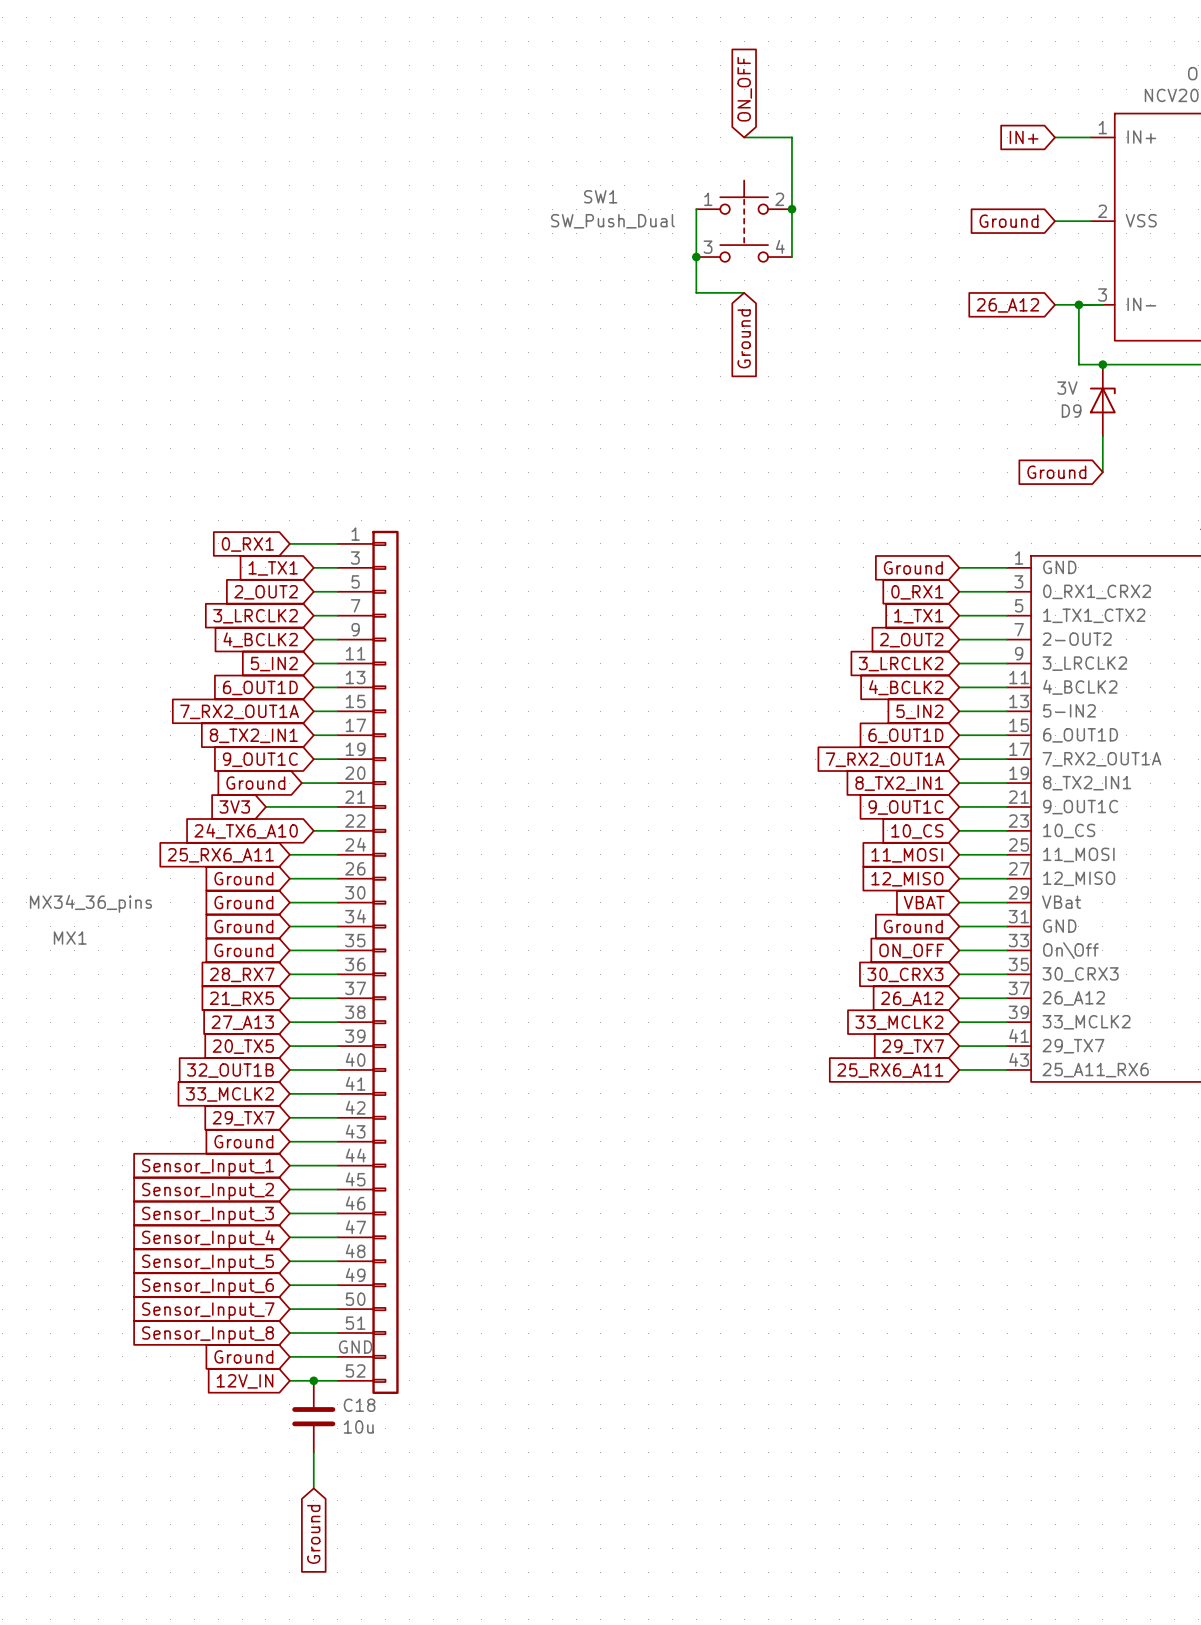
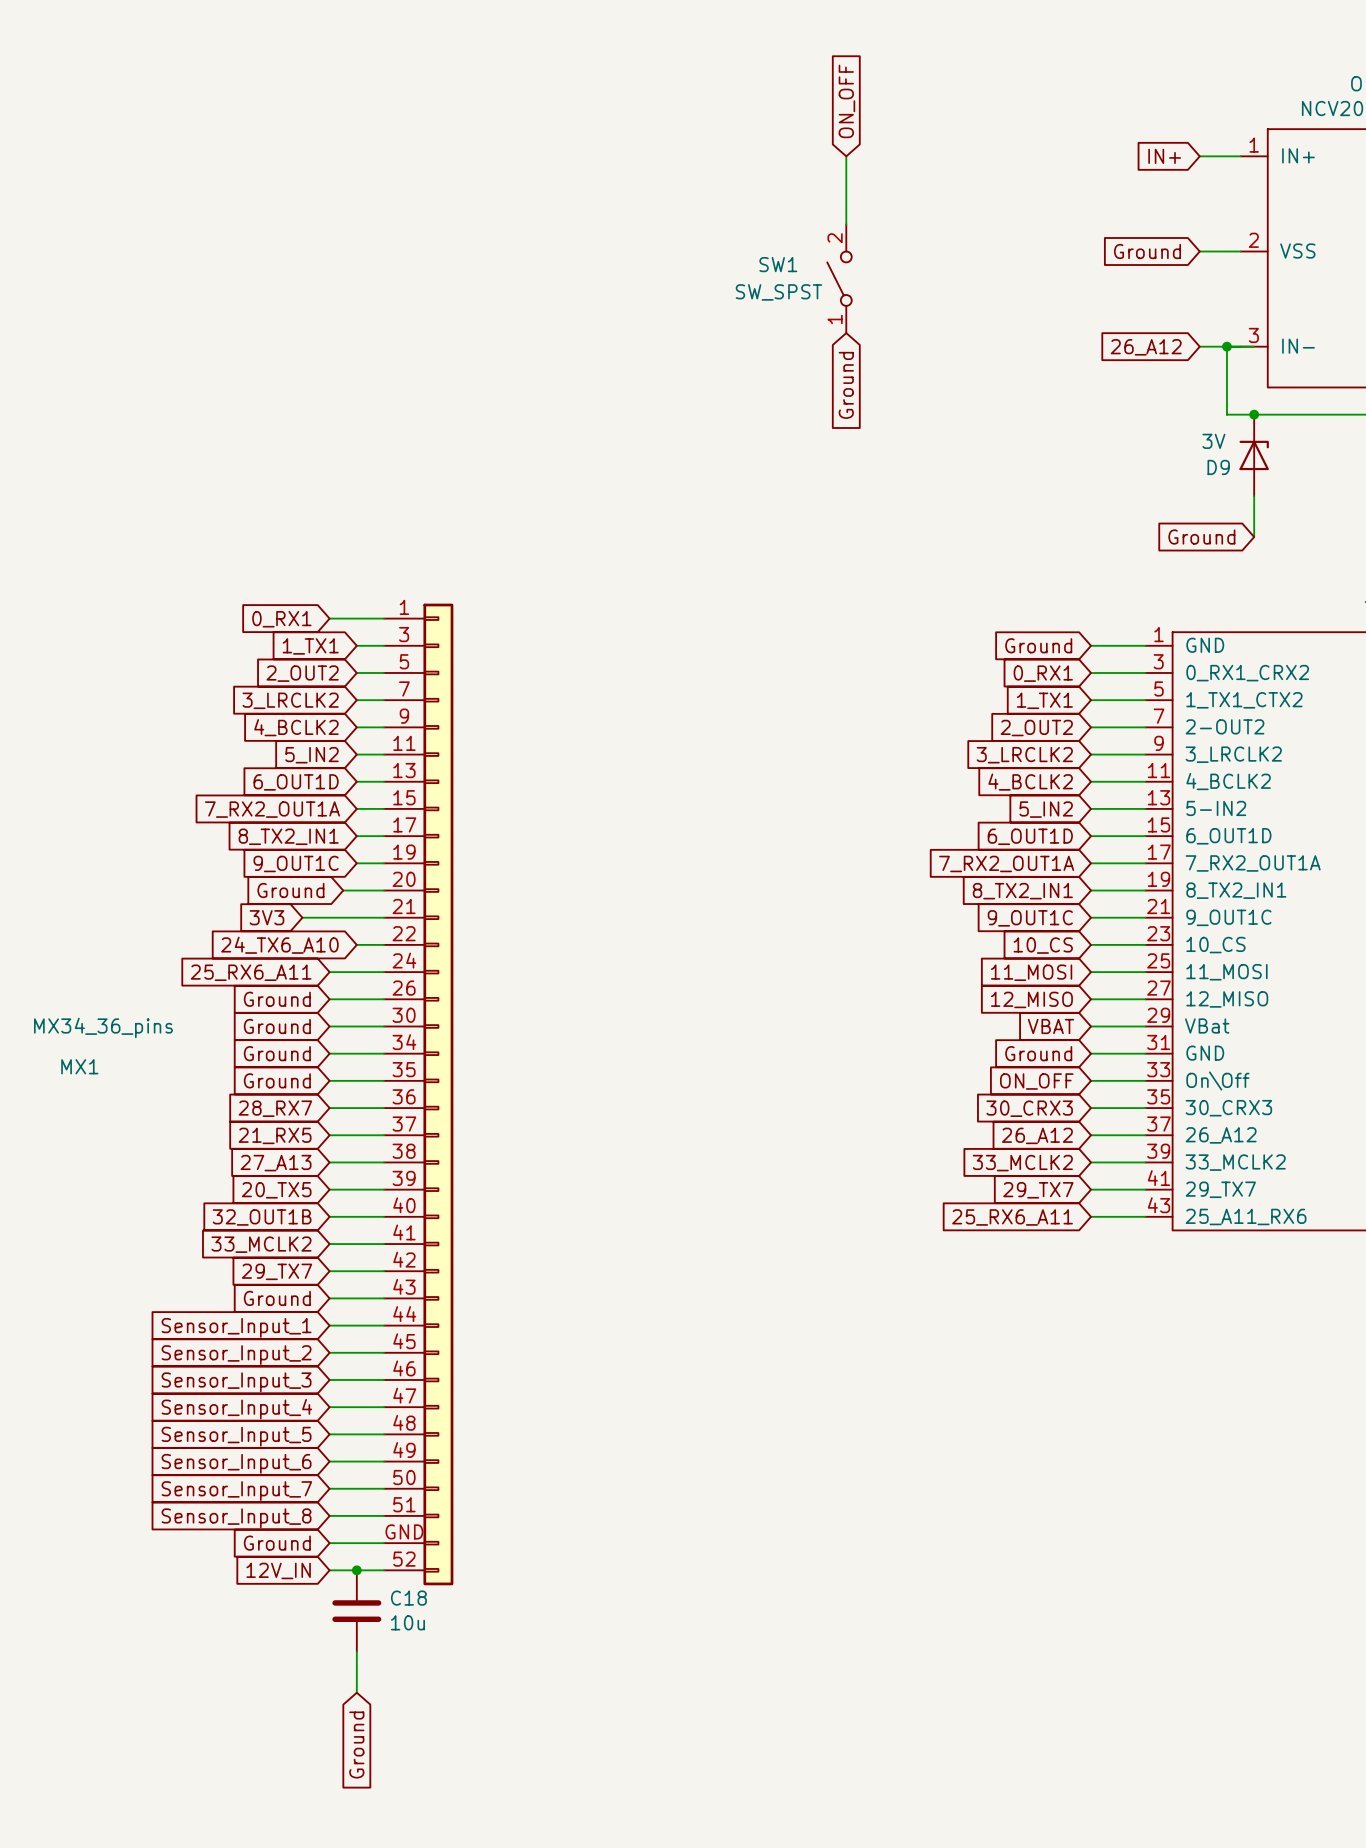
wire: (744, 137) (791, 137) (791, 257) -> (846, 156) (846, 224)
SW1 symbol: [696, 180, 792, 262] -> [827, 224, 852, 334]
SW1 name position: SW1 (600, 196) -> SW1 (778, 264)
wire: (696, 209) (696, 292) (744, 292) -> none
junction: (791, 209) -> none
SW1 value: SW_Push_Dual (612, 221) -> SW_SPST (778, 292)
junction: (696, 257) -> none

